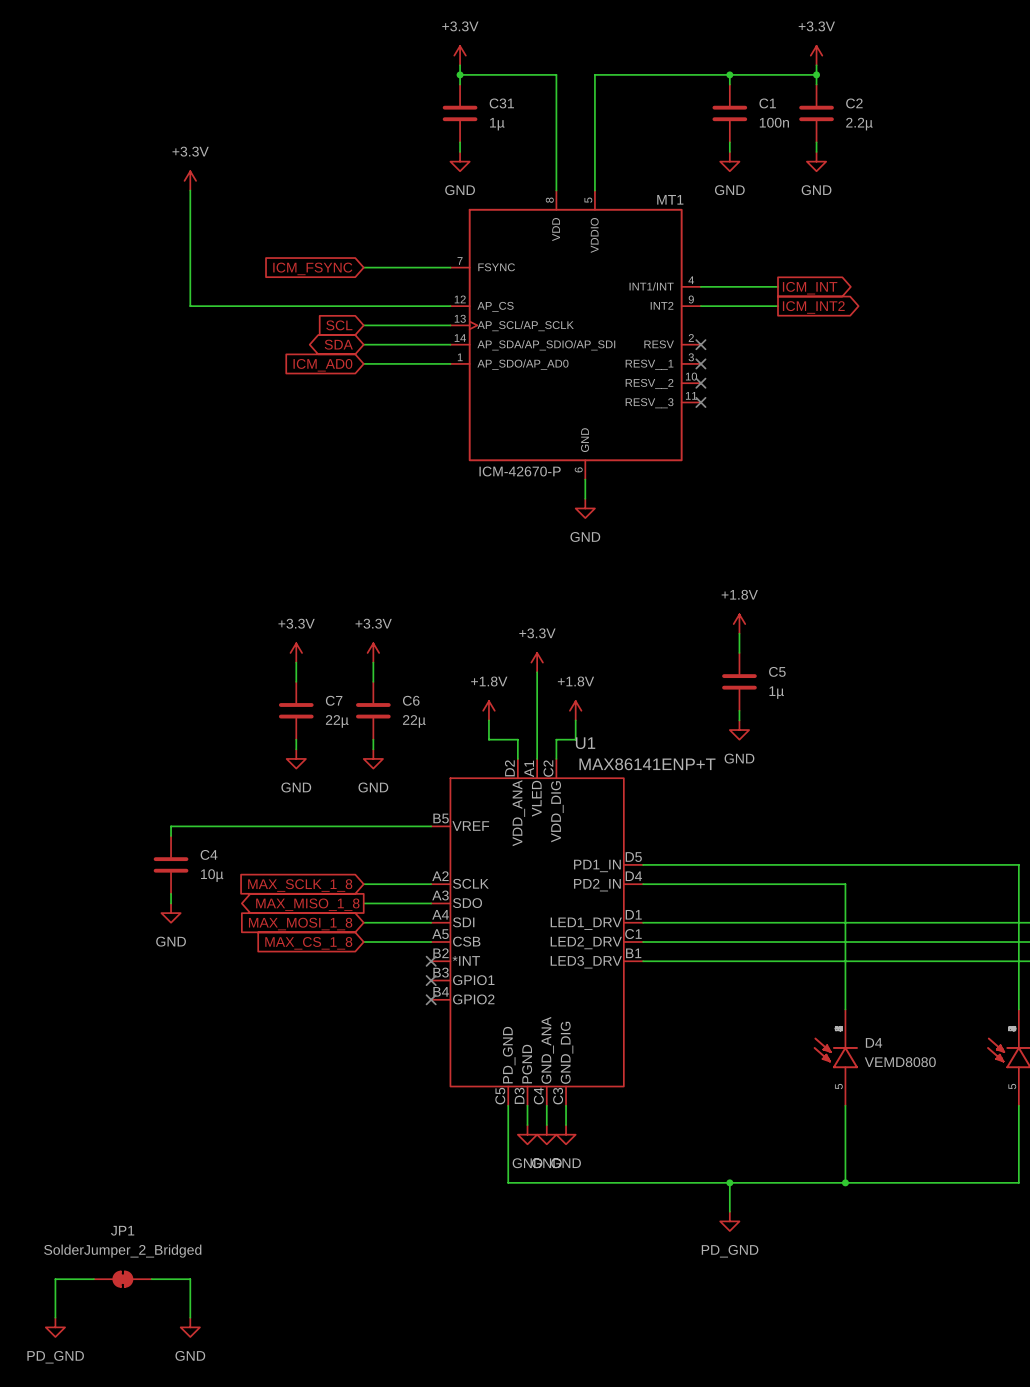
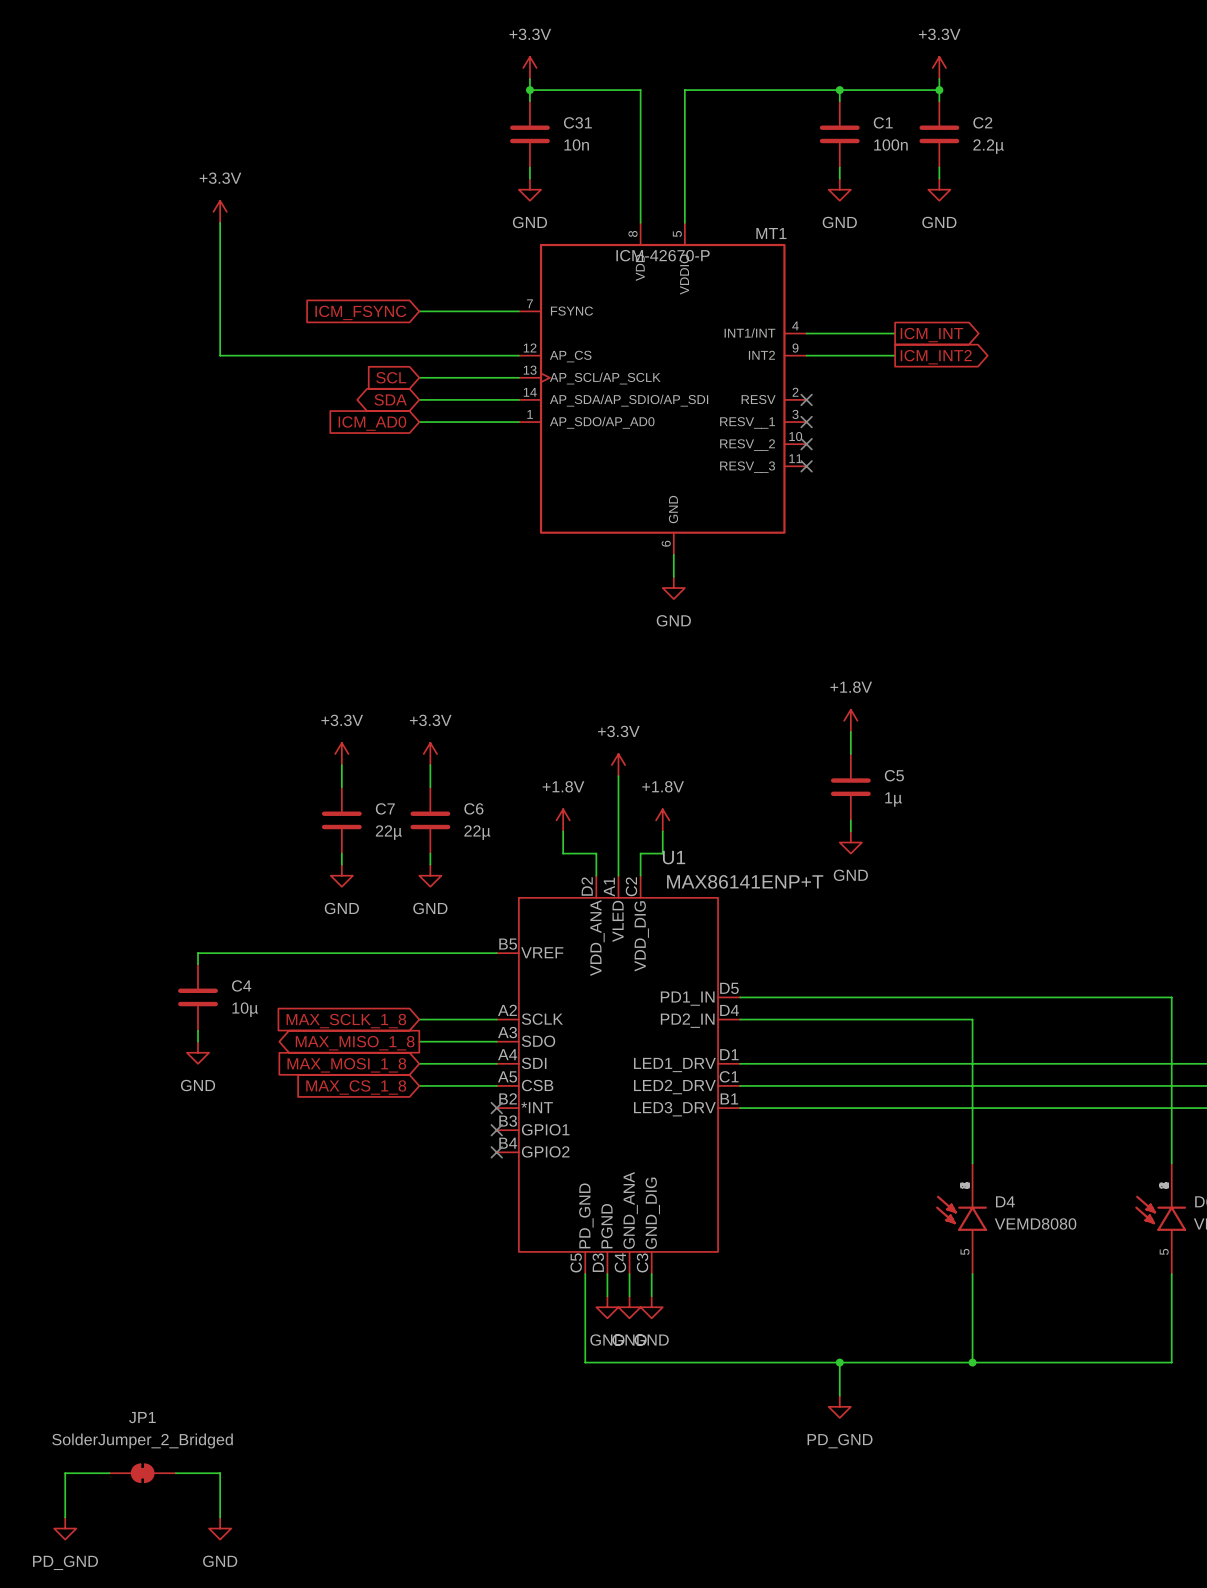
C31 value: 1µ (497, 124) -> 10n (576, 145)
MT1 value position: ICM-42670-P (520, 471) -> ICM-42670-P (663, 255)

